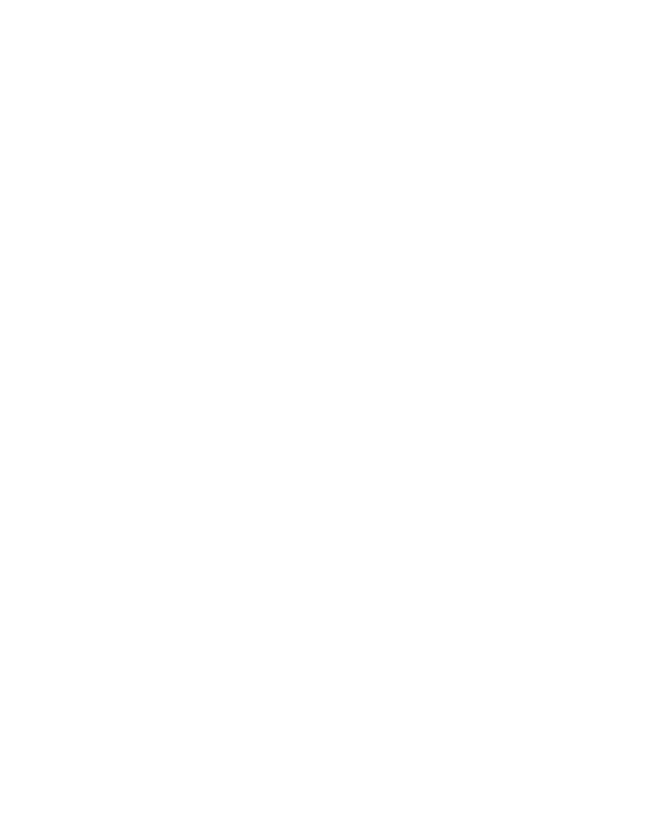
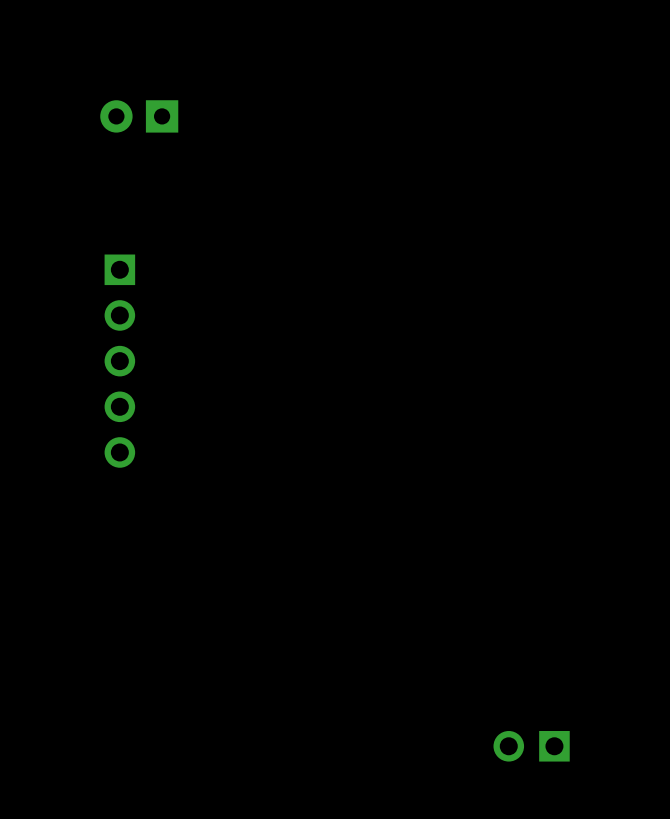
part: none -> (139, 116)
part: none -> (119, 361)
part: none -> (531, 746)

